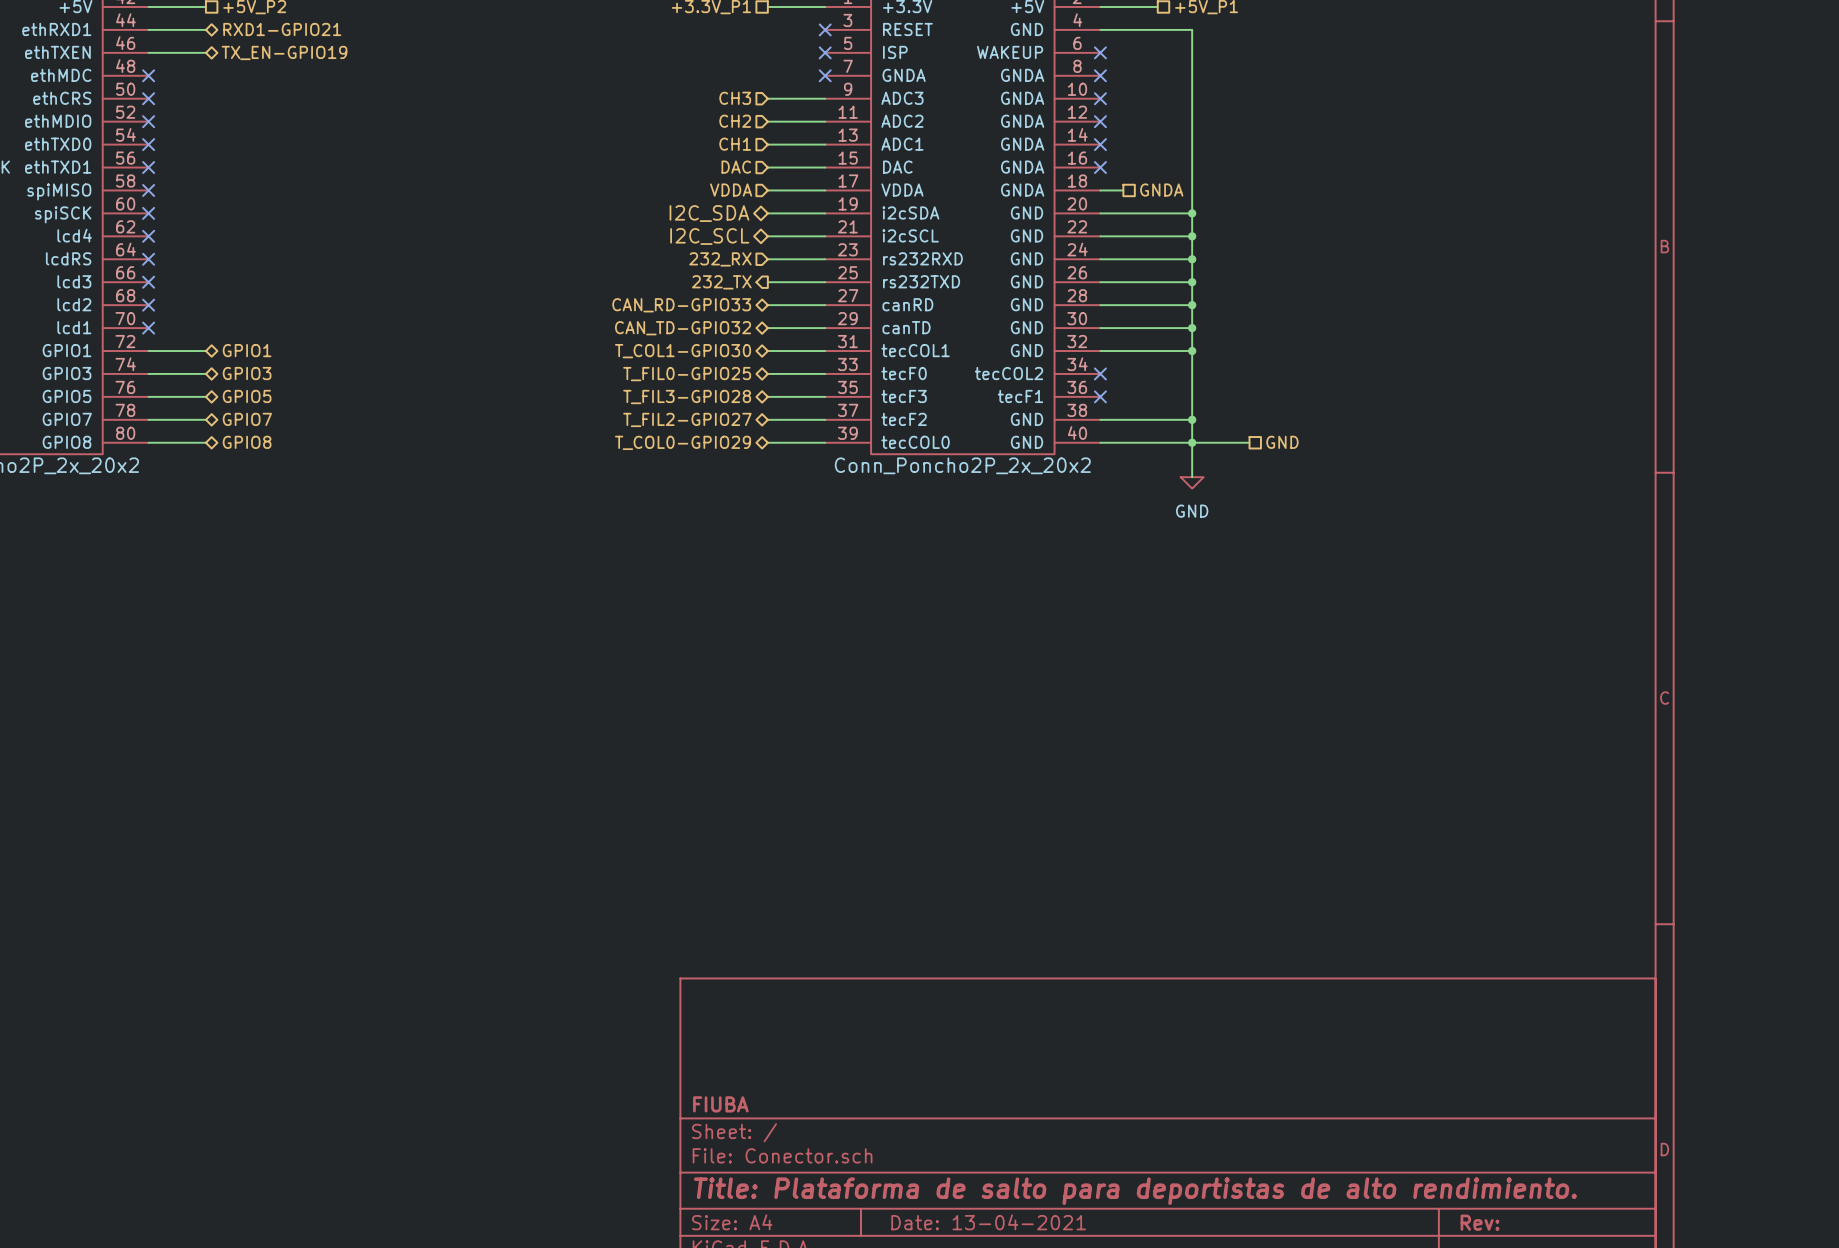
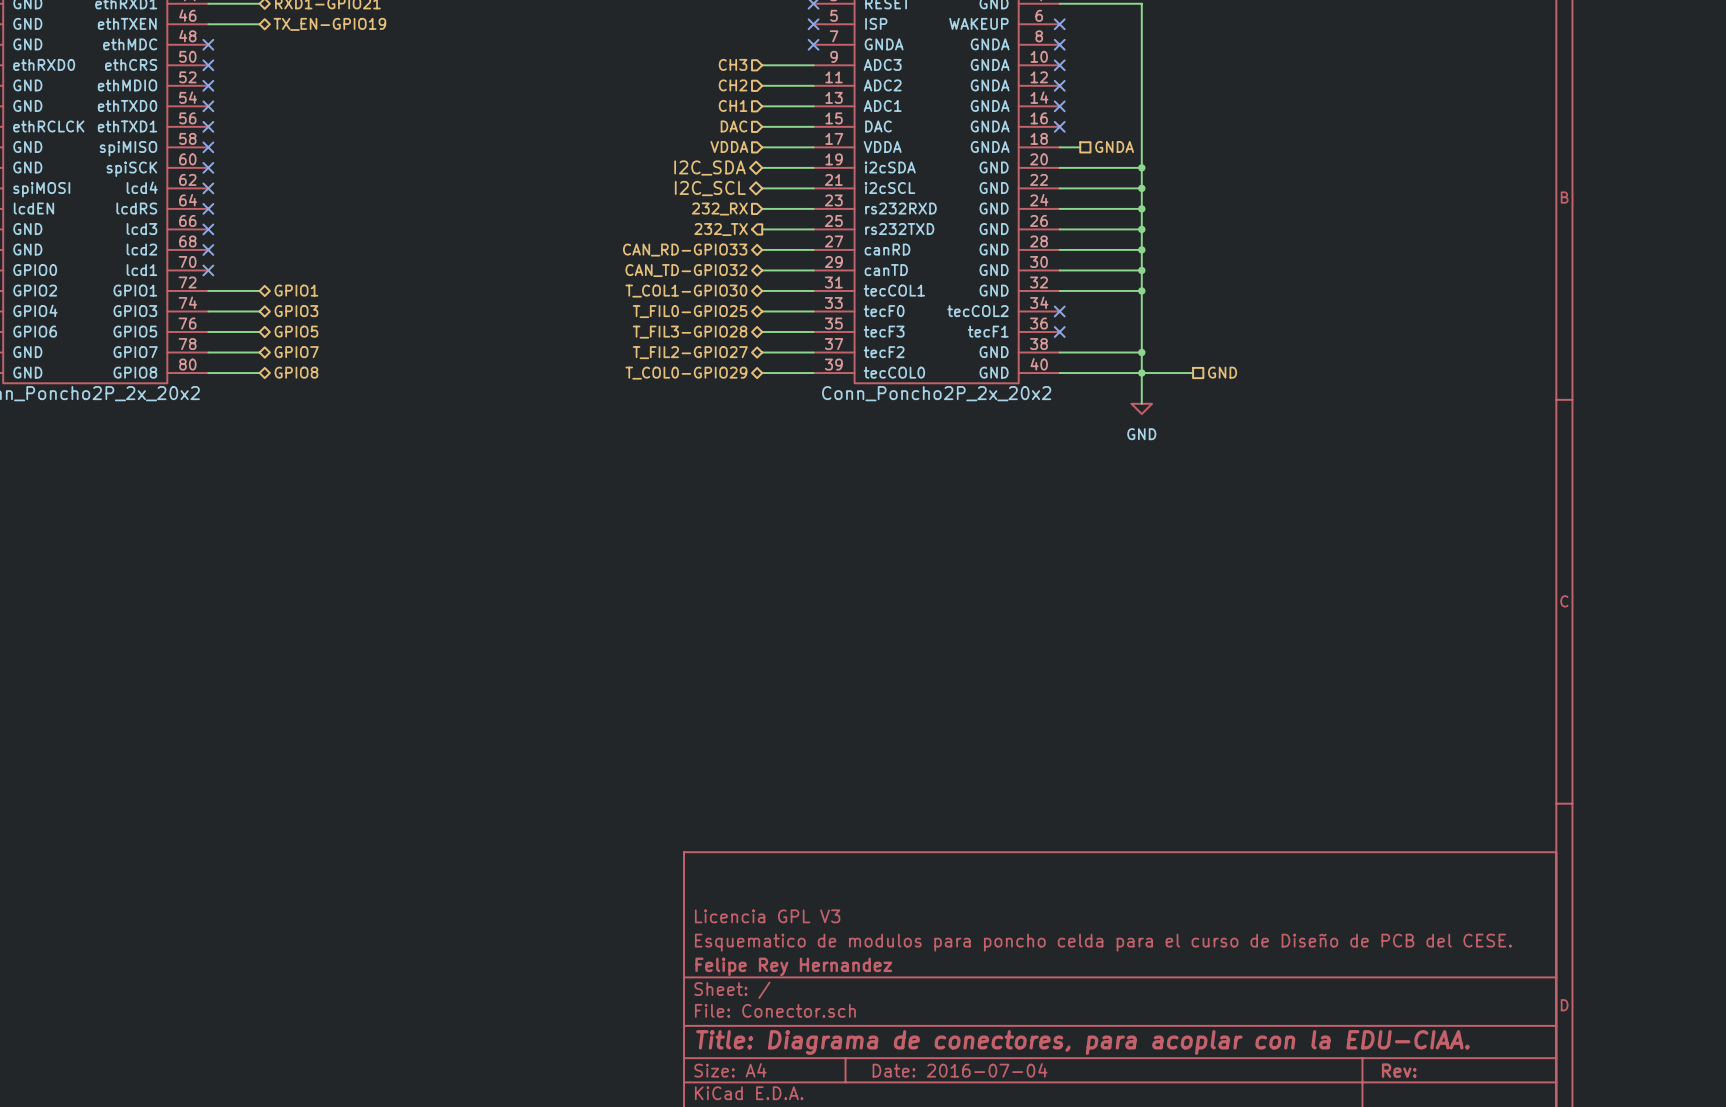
title block: none -> Licencia GPL V3 (767, 916)
title block: none -> Esquematico de modulos para poncho celda para el curso de Diseño de PCB del CESE. (1103, 942)
title block: FIUBA (720, 1104) -> Felipe Rey Hernandez (793, 966)
title block: Title: Plataforma de salto para deportistas de alto rendimiento. (1135, 1191) -> Title: Diagrama de conectores, para acoplar con la EDU-CIAA. (1082, 1042)
title block: Date: 13-04-2021 (988, 1222) -> Date: 2016-07-04 (960, 1070)

